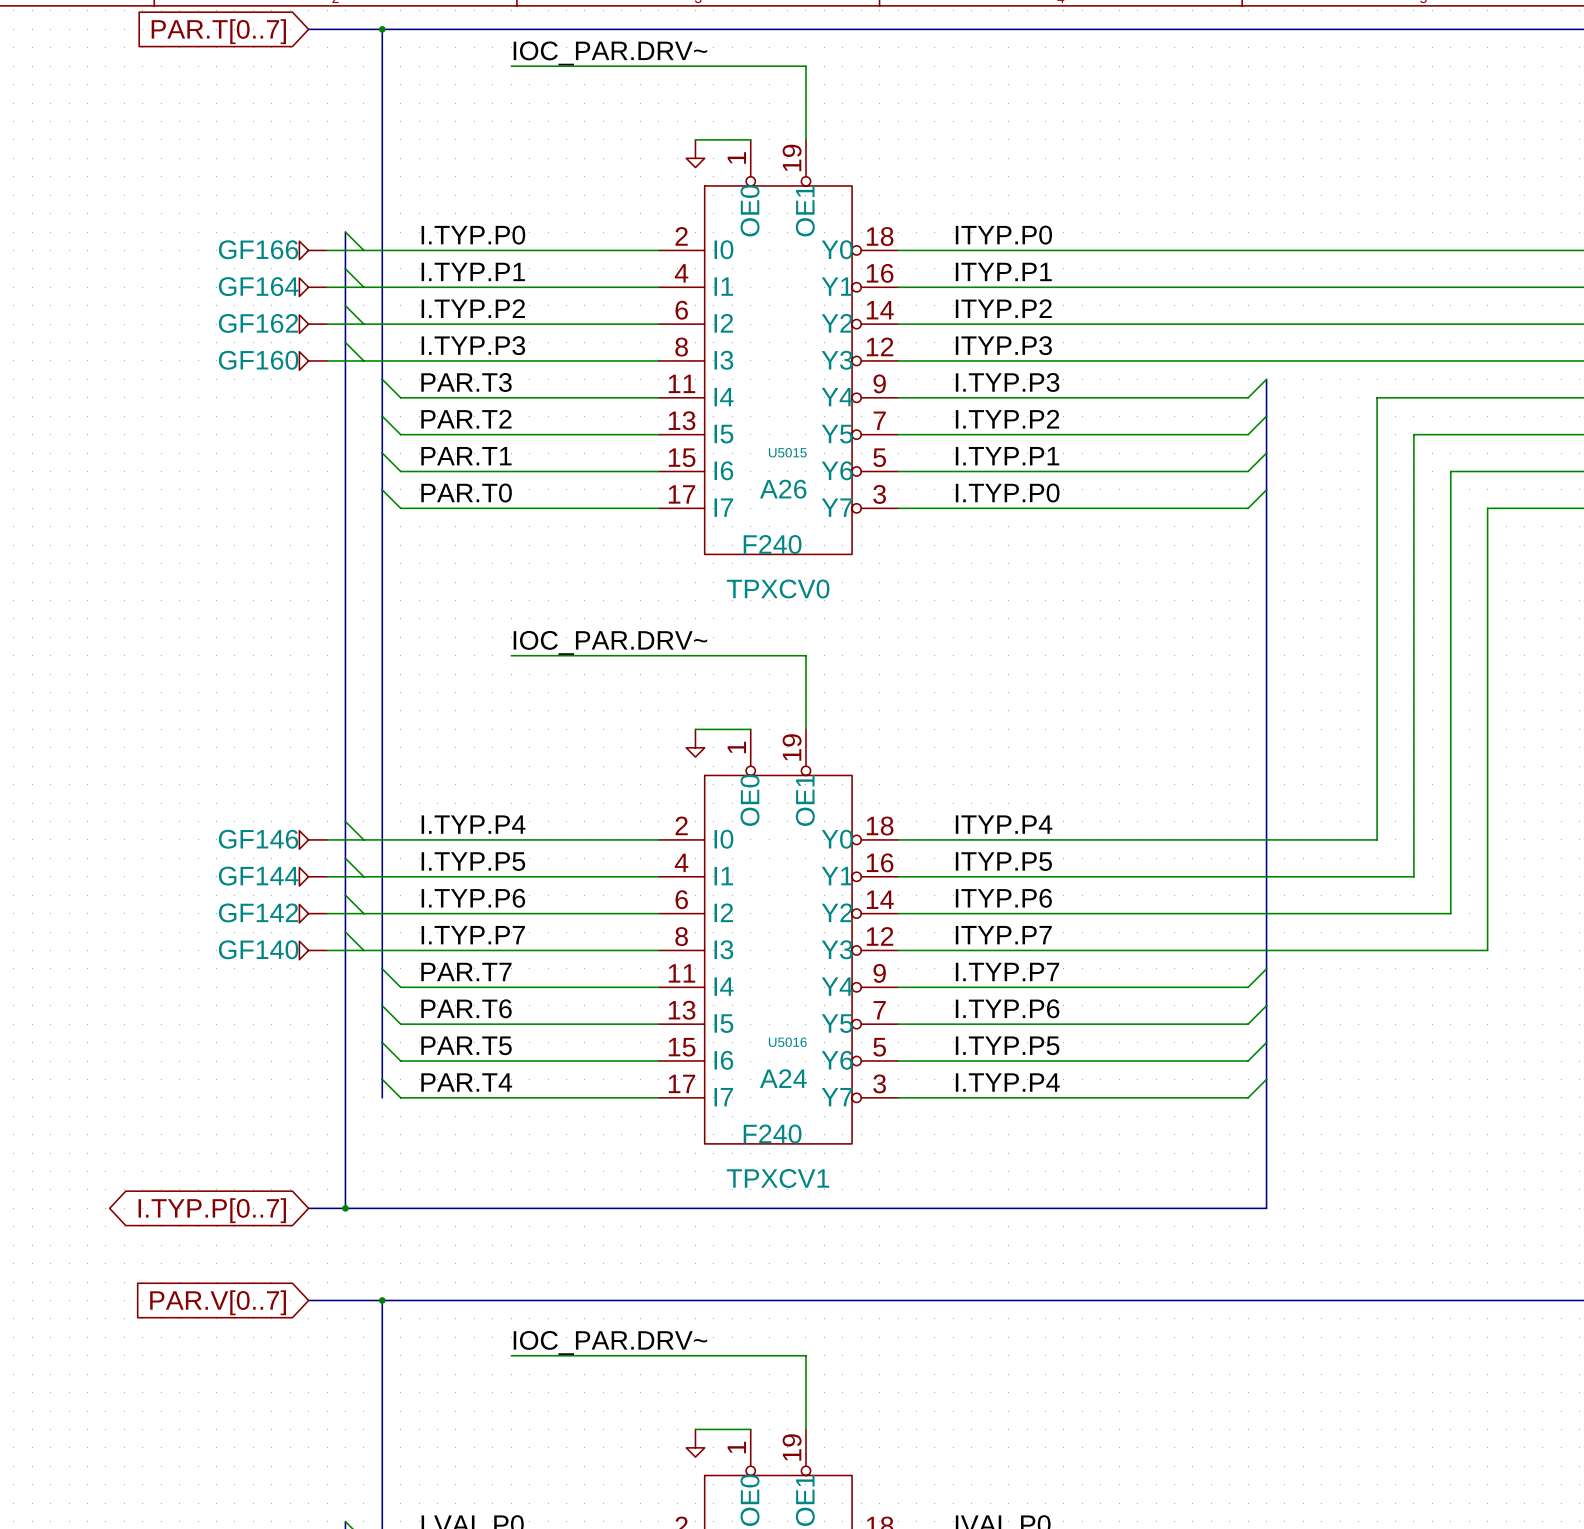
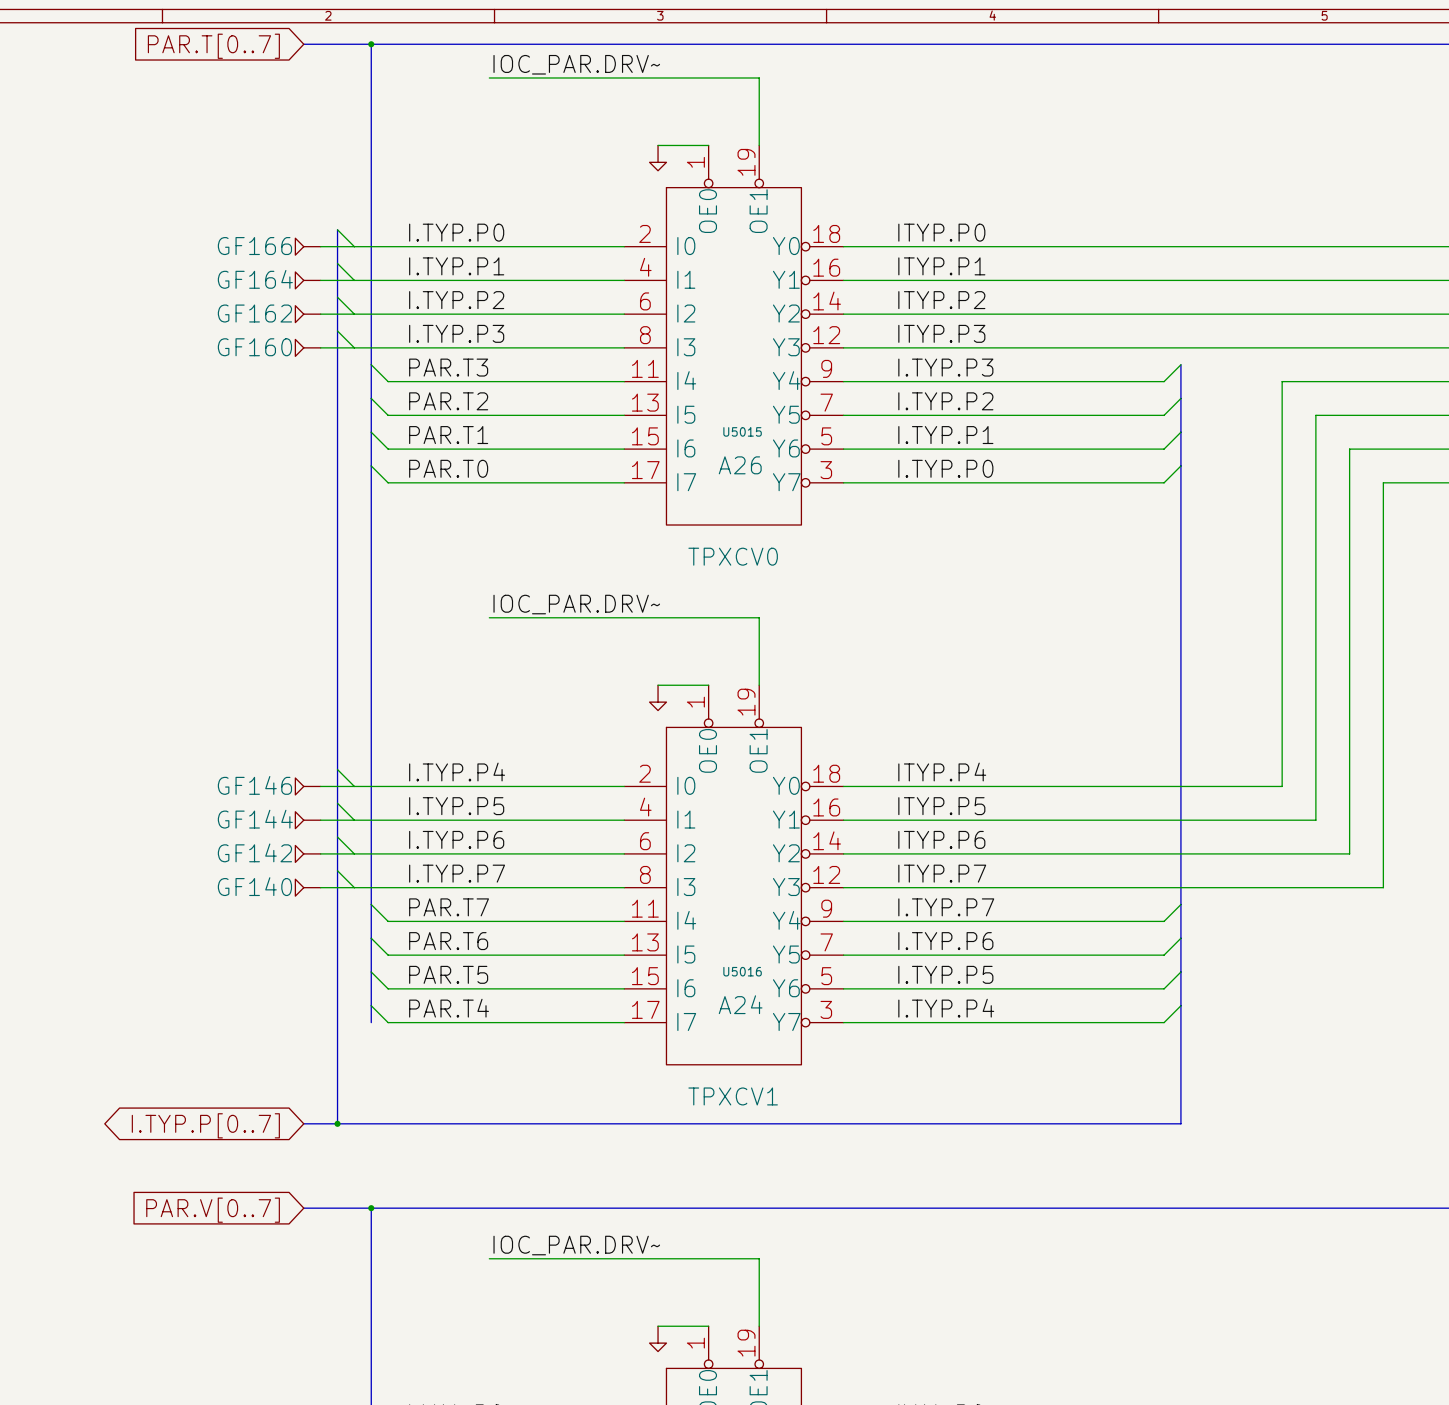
U5015 value: F240 (772, 544) -> none
U5016 value: F240 (772, 1133) -> none

